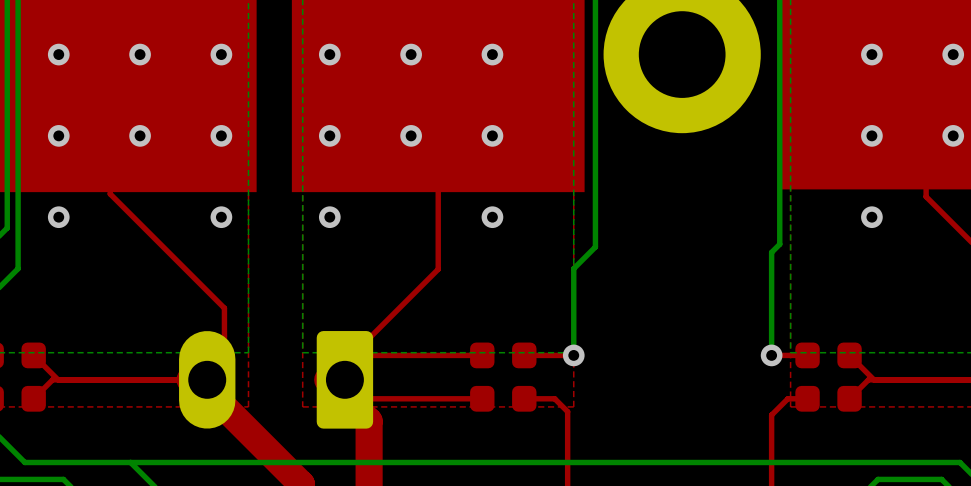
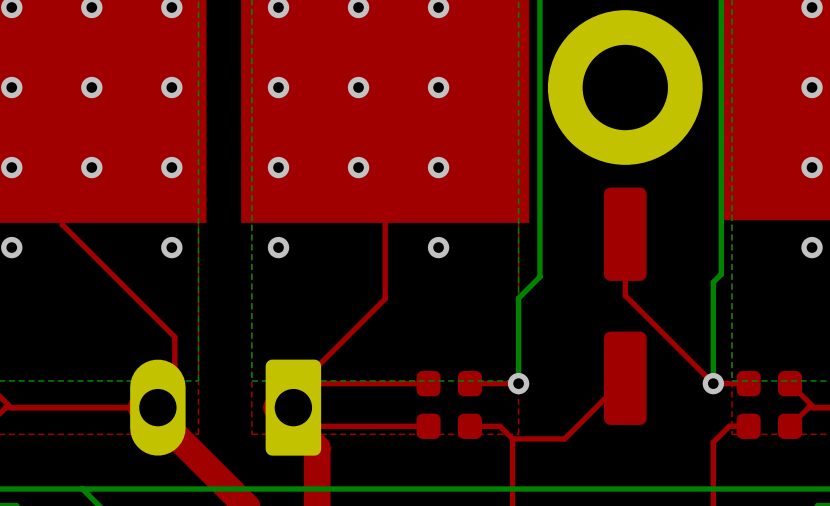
top track: none -> (625, 234) (625, 295) (713, 383)
part: none -> (625, 306)
top track: none -> (625, 378) (564, 438) (512, 438)

